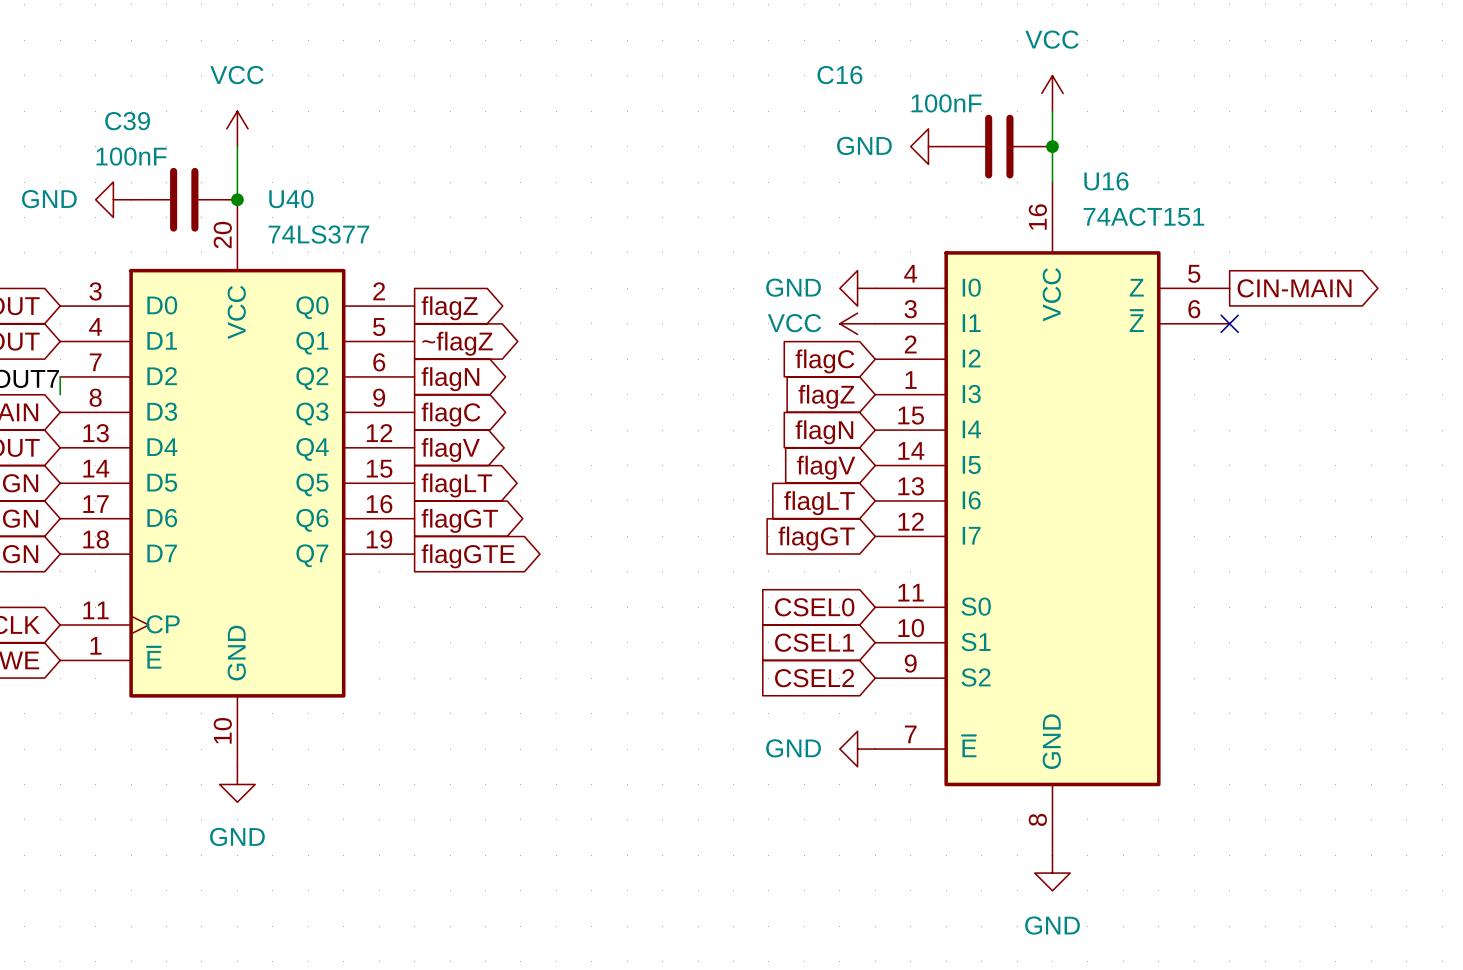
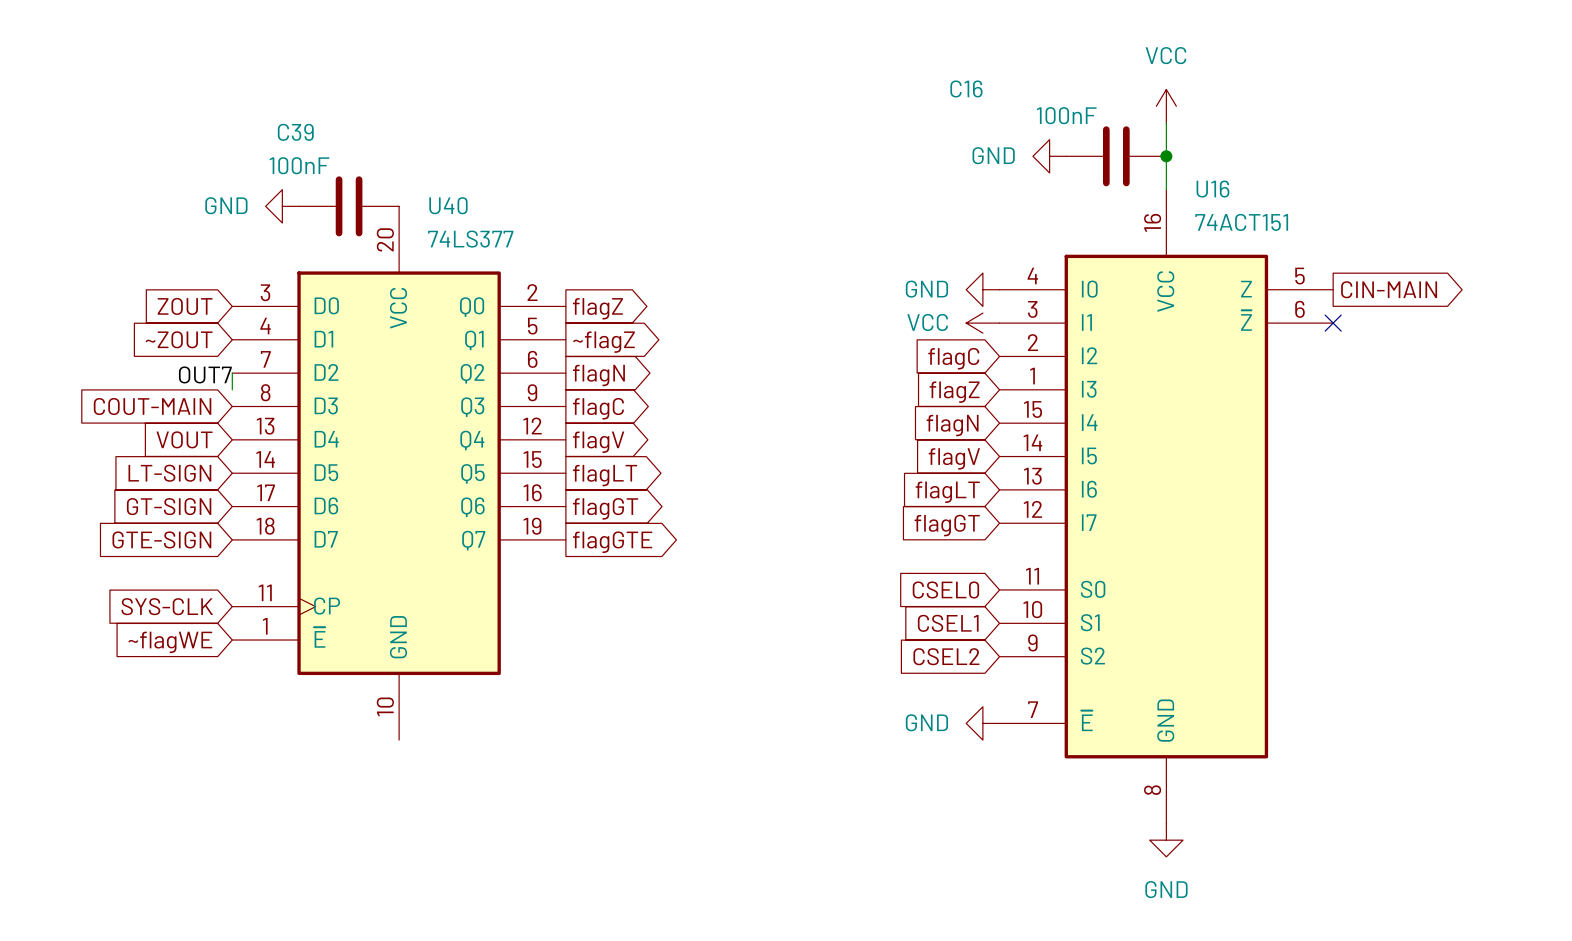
power symbol: VCC (237, 128) -> none
wire: (237, 146) (237, 199) -> none
junction: (237, 199) -> none
power symbol: GND (237, 784) -> none

